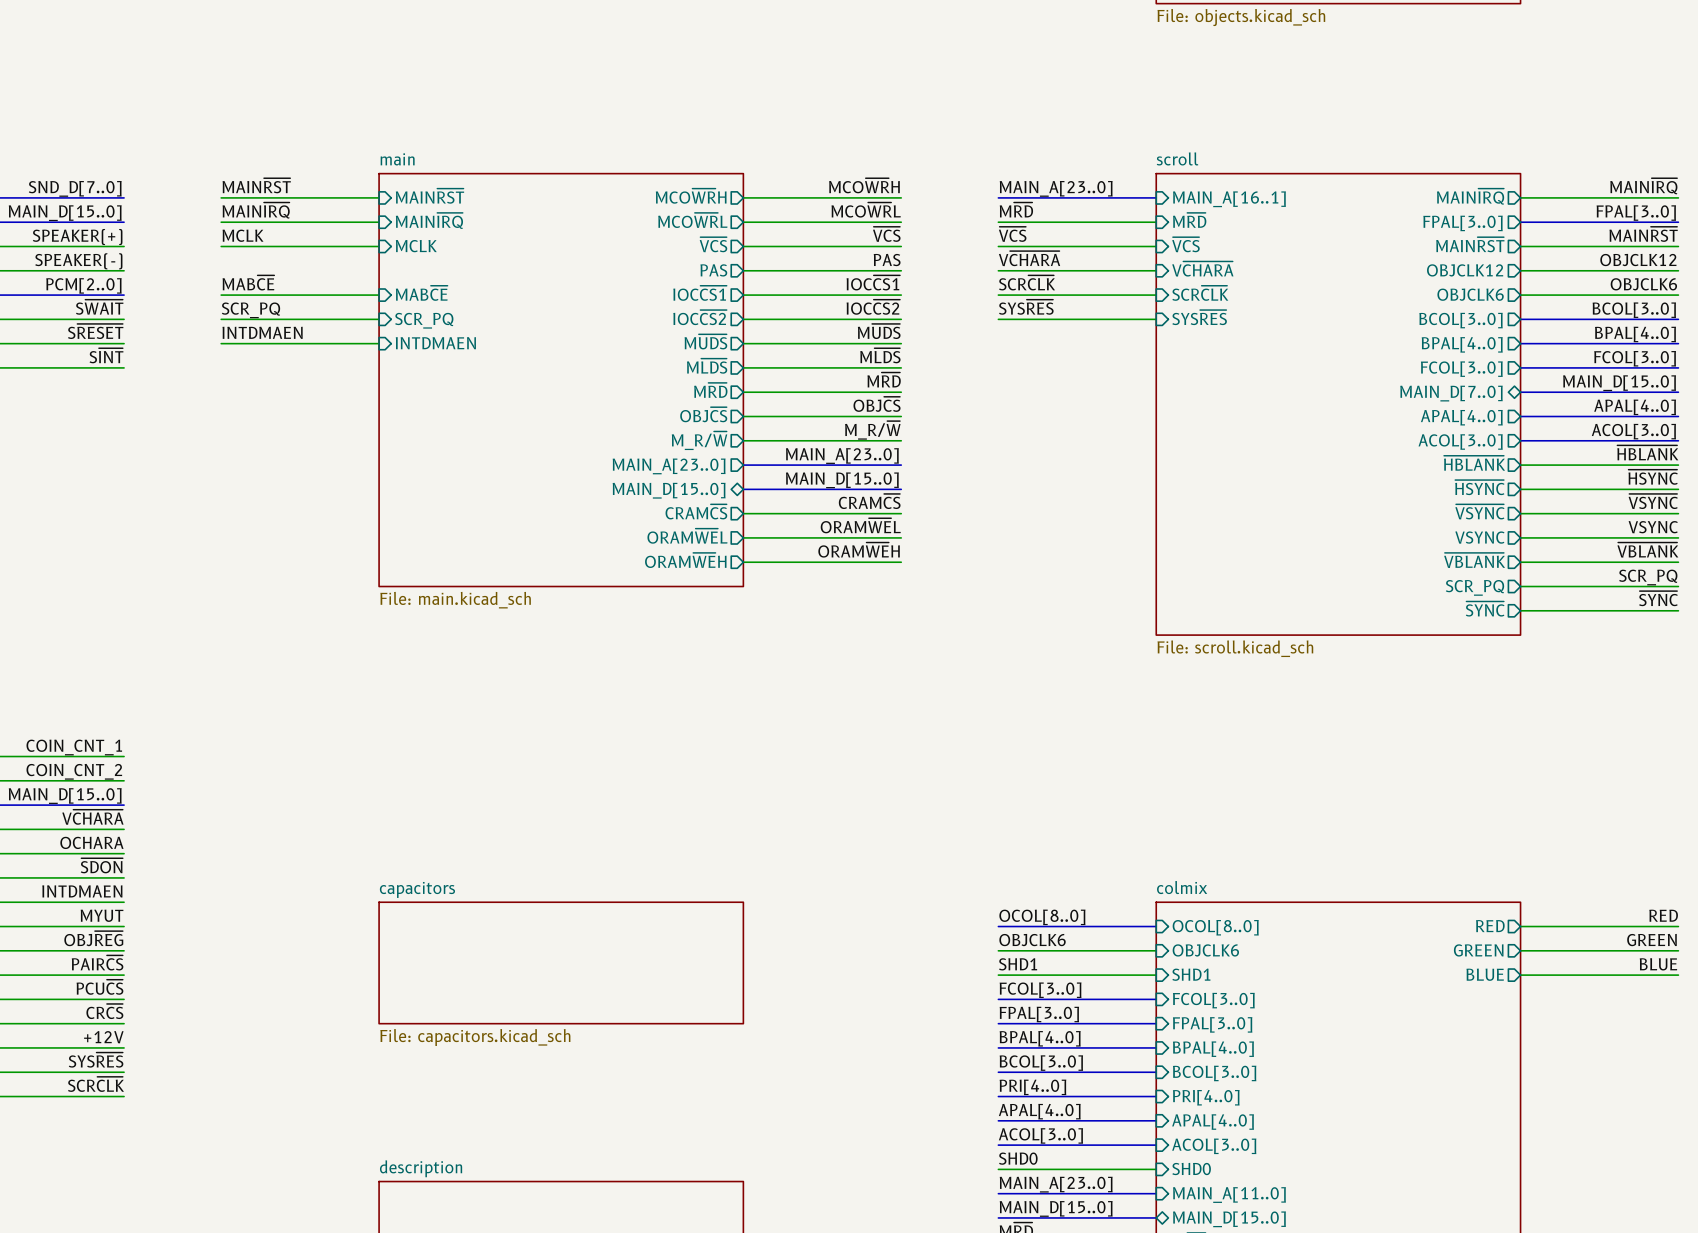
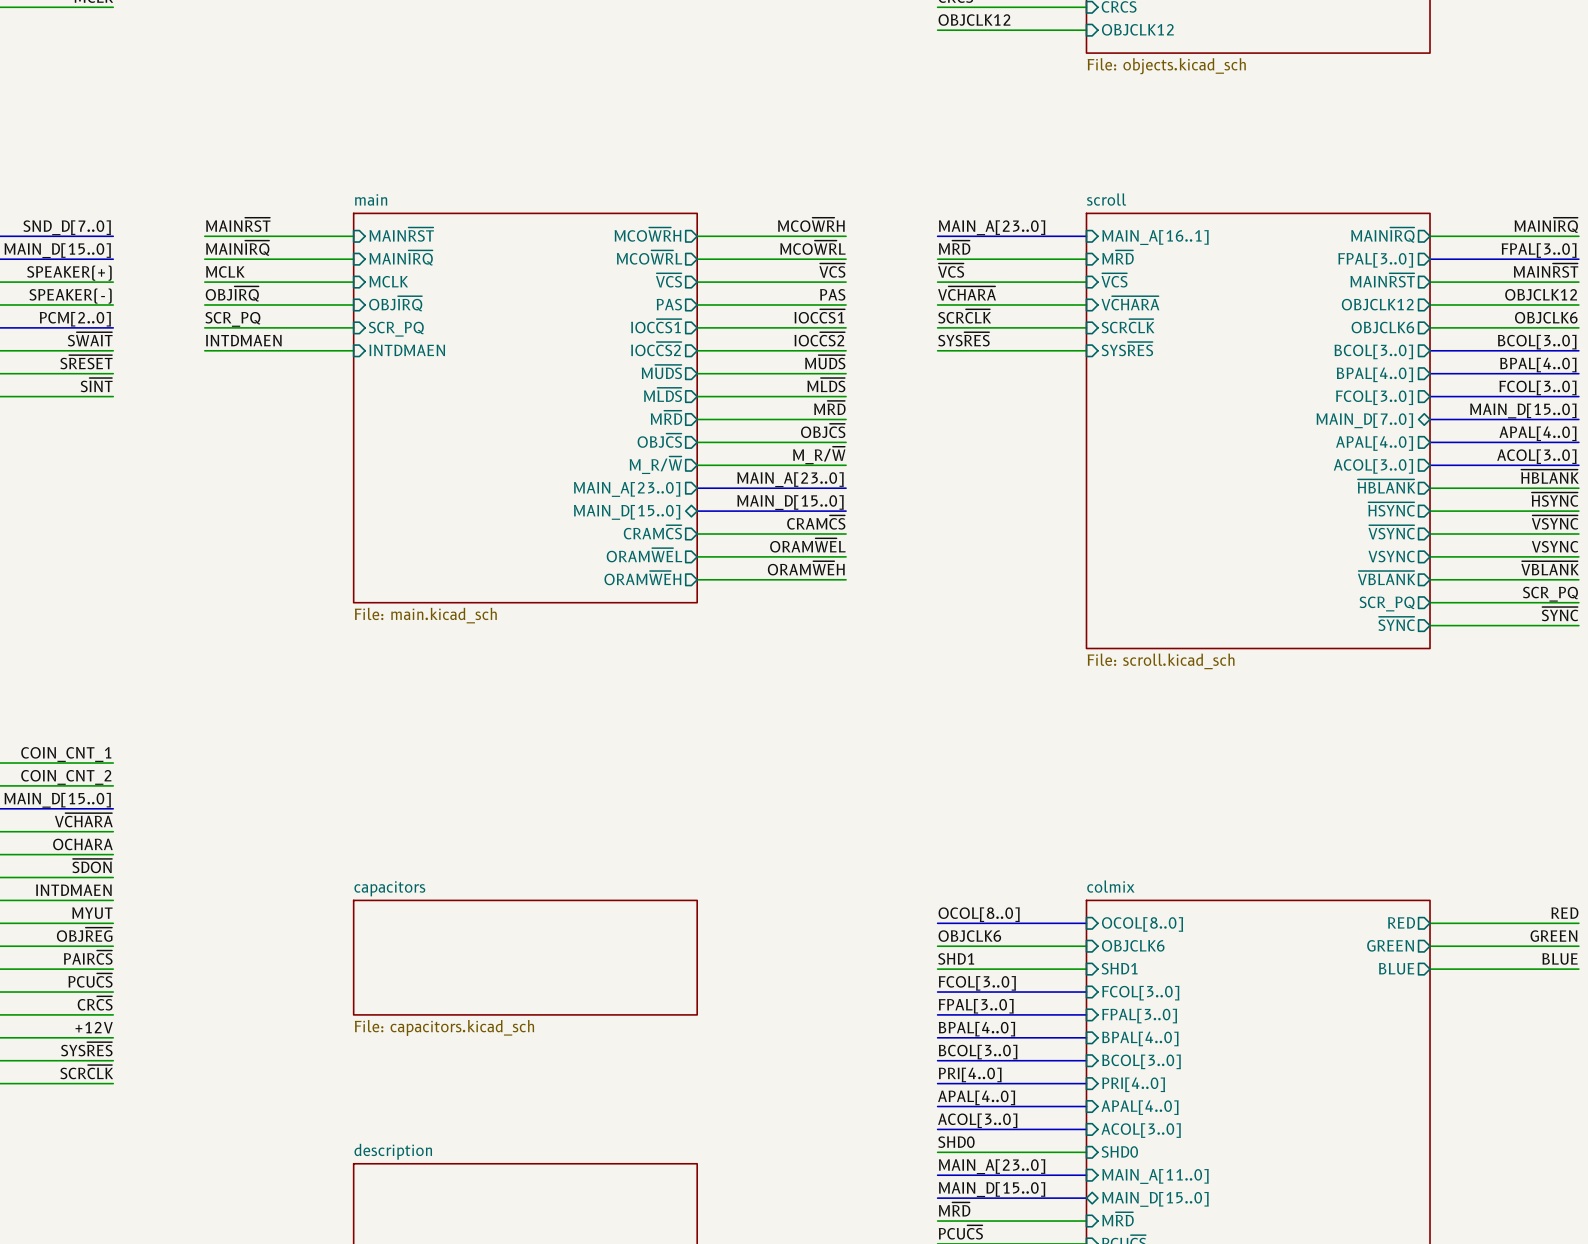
label: none -> OBJ~{IRQ} (232, 294)
sheet pin: none -> OBJ~{IRQ} (395, 303)
label: MAB~{CE} (248, 282) -> SCR_PQ (232, 319)
sheet pin: MAB~{CE} (421, 293) -> SCR_PQ (396, 329)
label: SCR_PQ (250, 310) -> INTDMAEN (243, 340)
sheet pin: SCR_PQ (424, 320) -> INTDMAEN (407, 350)
label: INTDMAEN (262, 332) -> none
wire: (221, 343) (379, 343) -> (204, 304) (353, 304)
sheet pin: INTDMAEN (435, 343) -> none

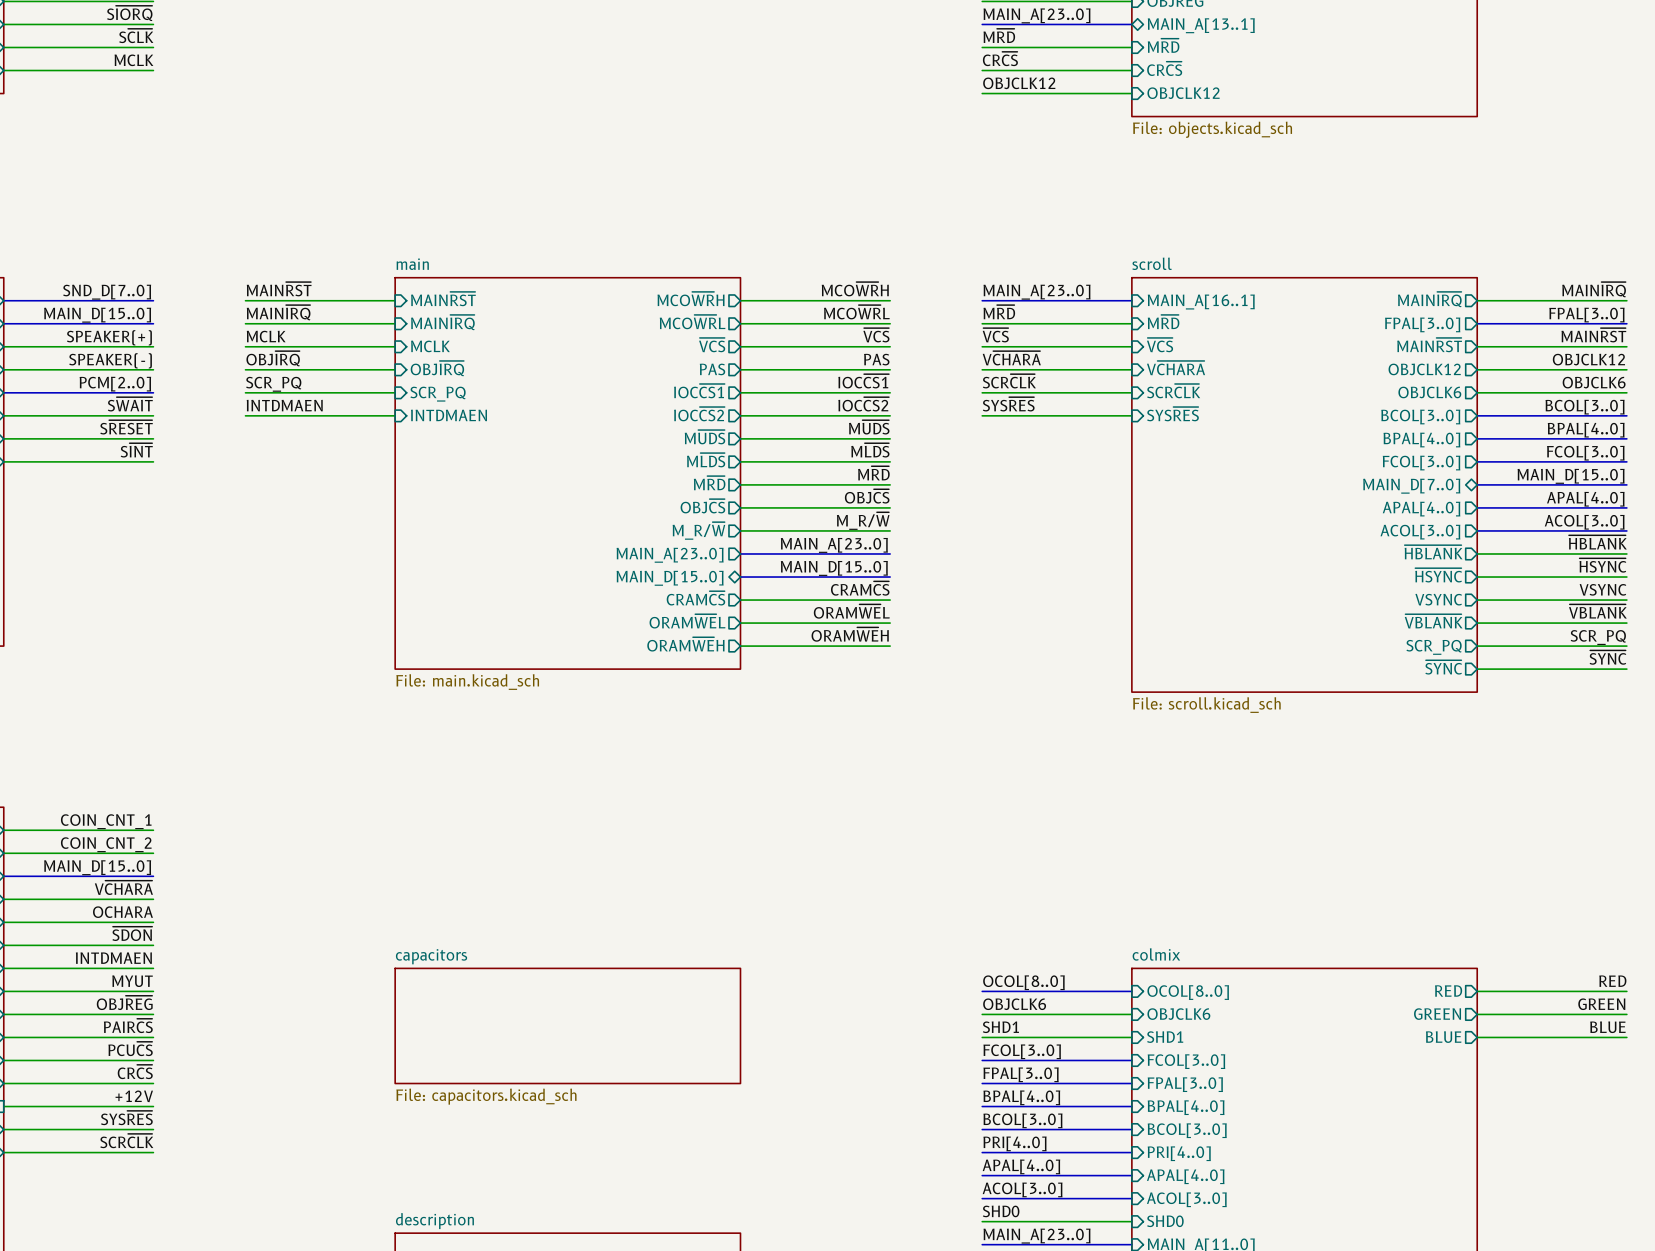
sheet scroll: none -> File: scroll.kicad_sch (1304, 484)
sheet scroll: File: scroll.kicad_sch (1258, 430) -> none
label: ~{VSYNC} (1555, 522) -> VSYNC (1602, 589)
sheet pin: ~{VSYNC} (1391, 532) -> VSYNC (1438, 599)
label: VSYNC (1555, 546) -> ~{VBLANK} (1597, 611)
sheet pin: VSYNC (1391, 556) -> ~{VBLANK} (1433, 621)
label: ~{VBLANK} (1550, 568) -> SCR_PQ (1598, 637)
sheet pin: ~{VBLANK} (1386, 578) -> SCR_PQ (1434, 647)
label: SCR_PQ (1550, 594) -> ~{SYNC} (1607, 657)
sheet pin: SCR_PQ (1387, 604) -> ~{SYNC} (1443, 667)
label: ~{SYNC} (1560, 614) -> none
sheet pin: ~{SYNC} (1396, 623) -> none
wire: (1430, 625) (1578, 625) -> none

